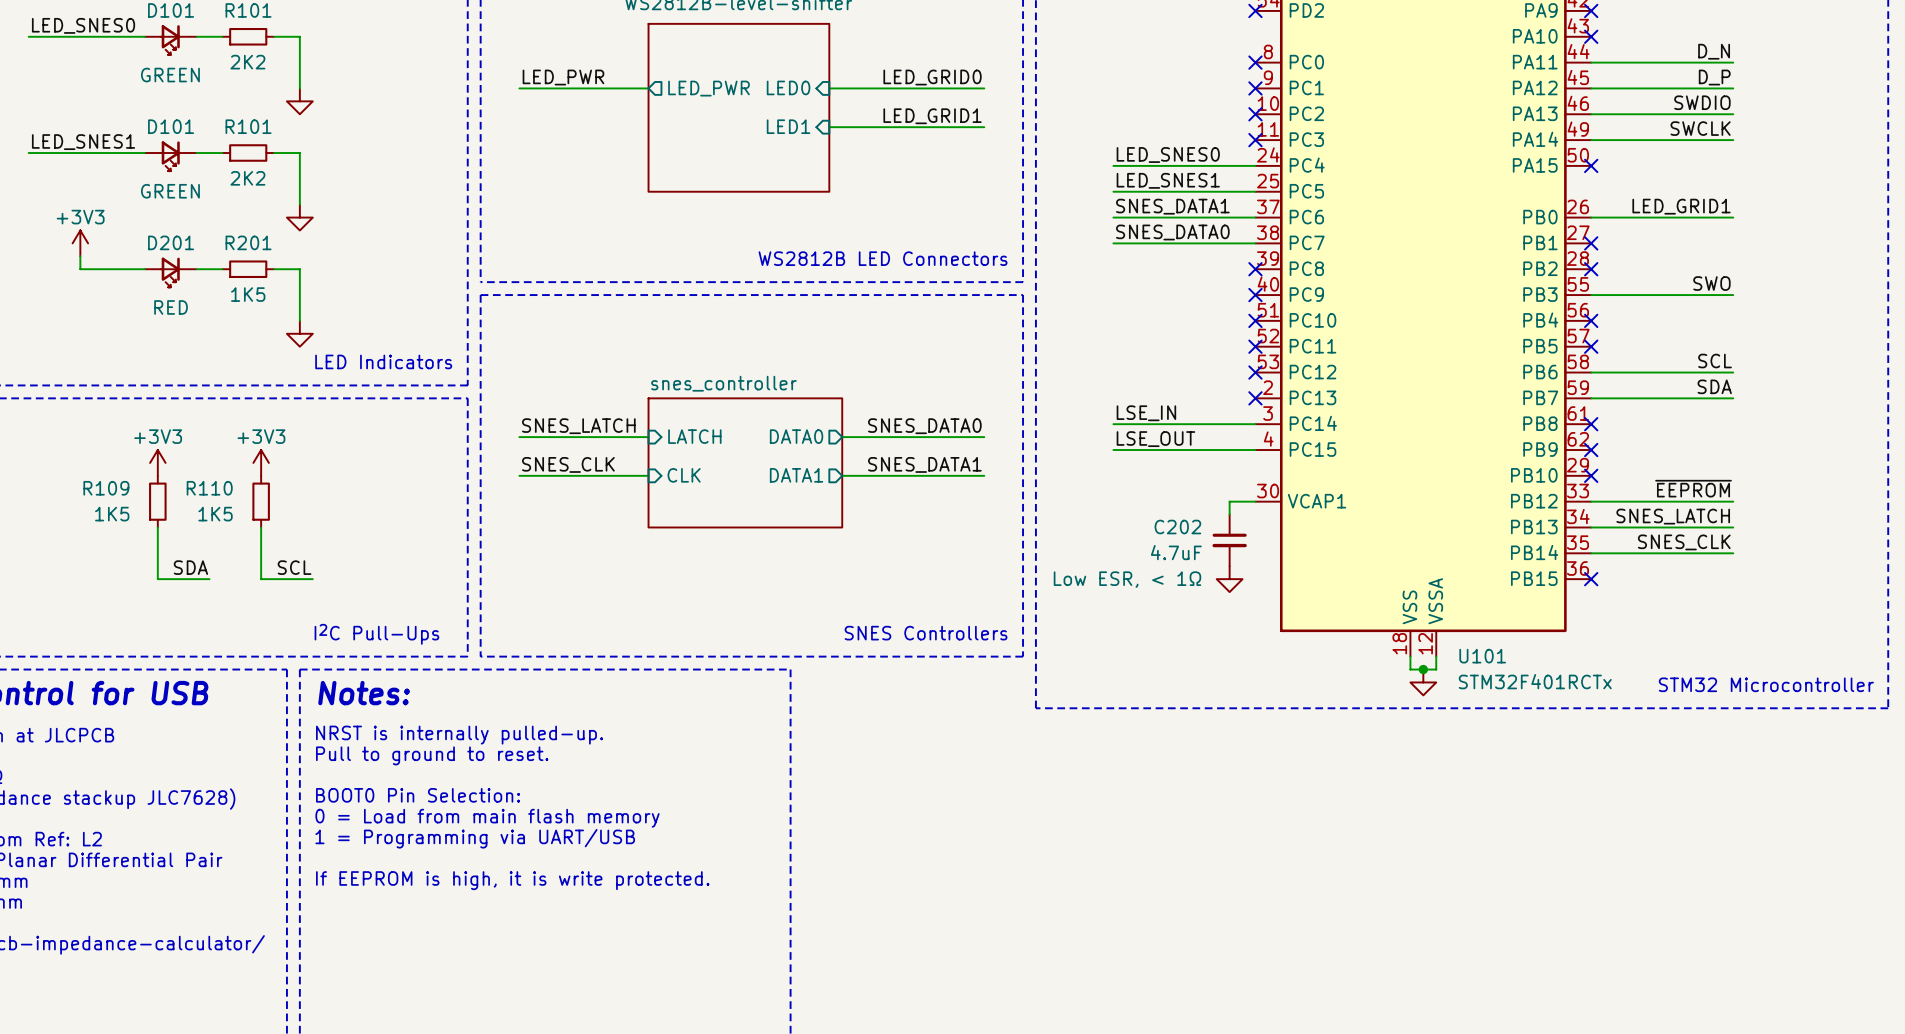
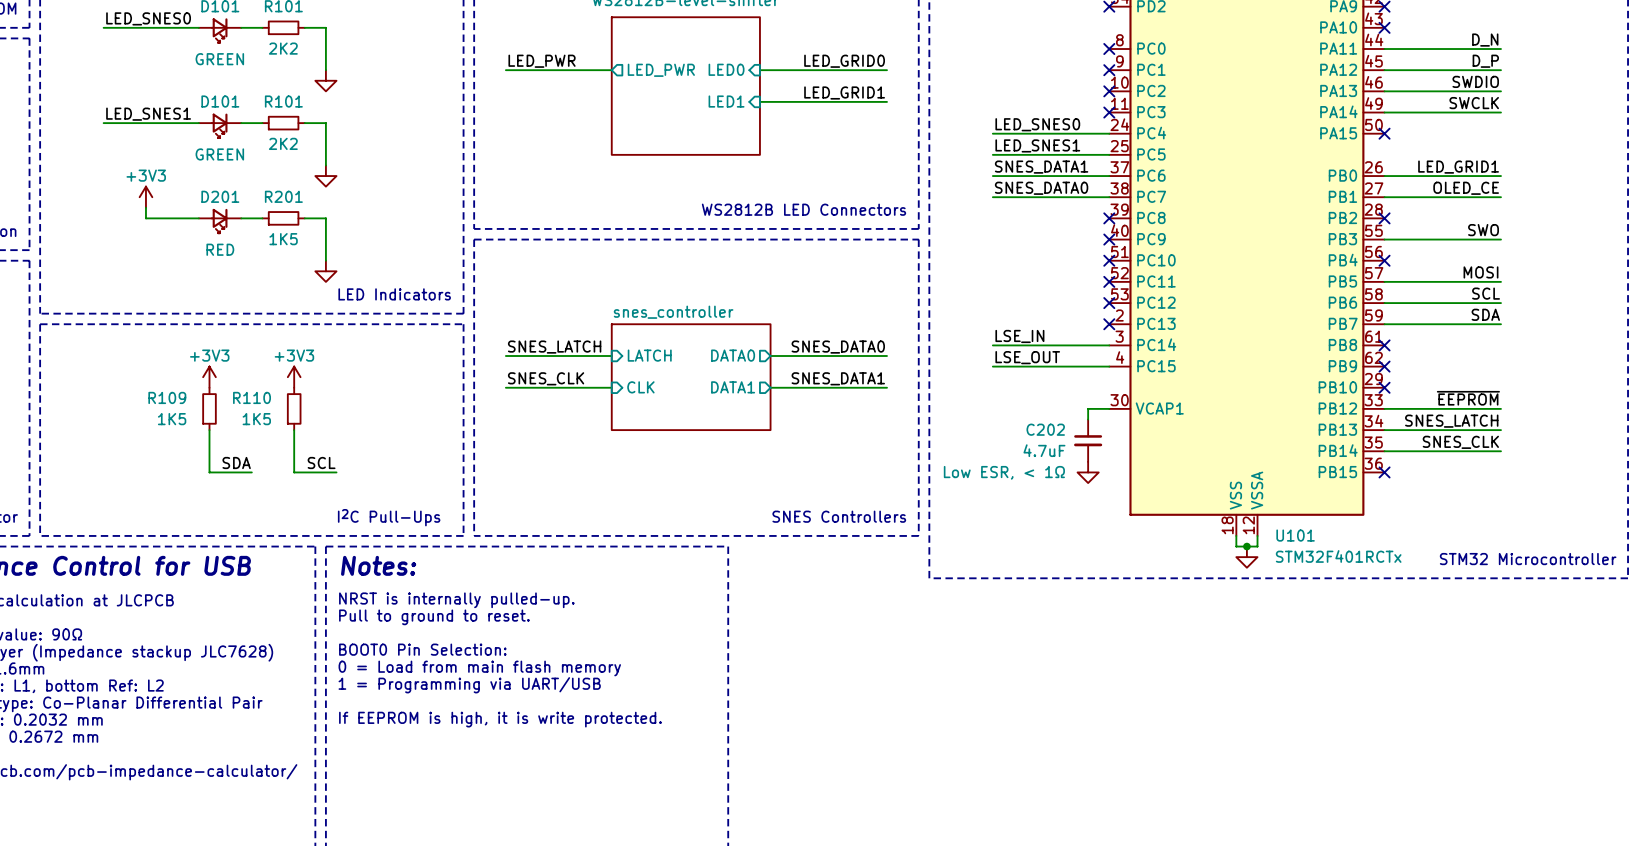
label: none -> OLED_CE (1466, 188)
wire: none -> (1384, 197) (1500, 197)
no-connect mark: (1591, 243) -> none
label: none -> MOSI (1481, 272)
wire: none -> (1384, 281) (1500, 281)
no-connect mark: (1591, 346) -> none

